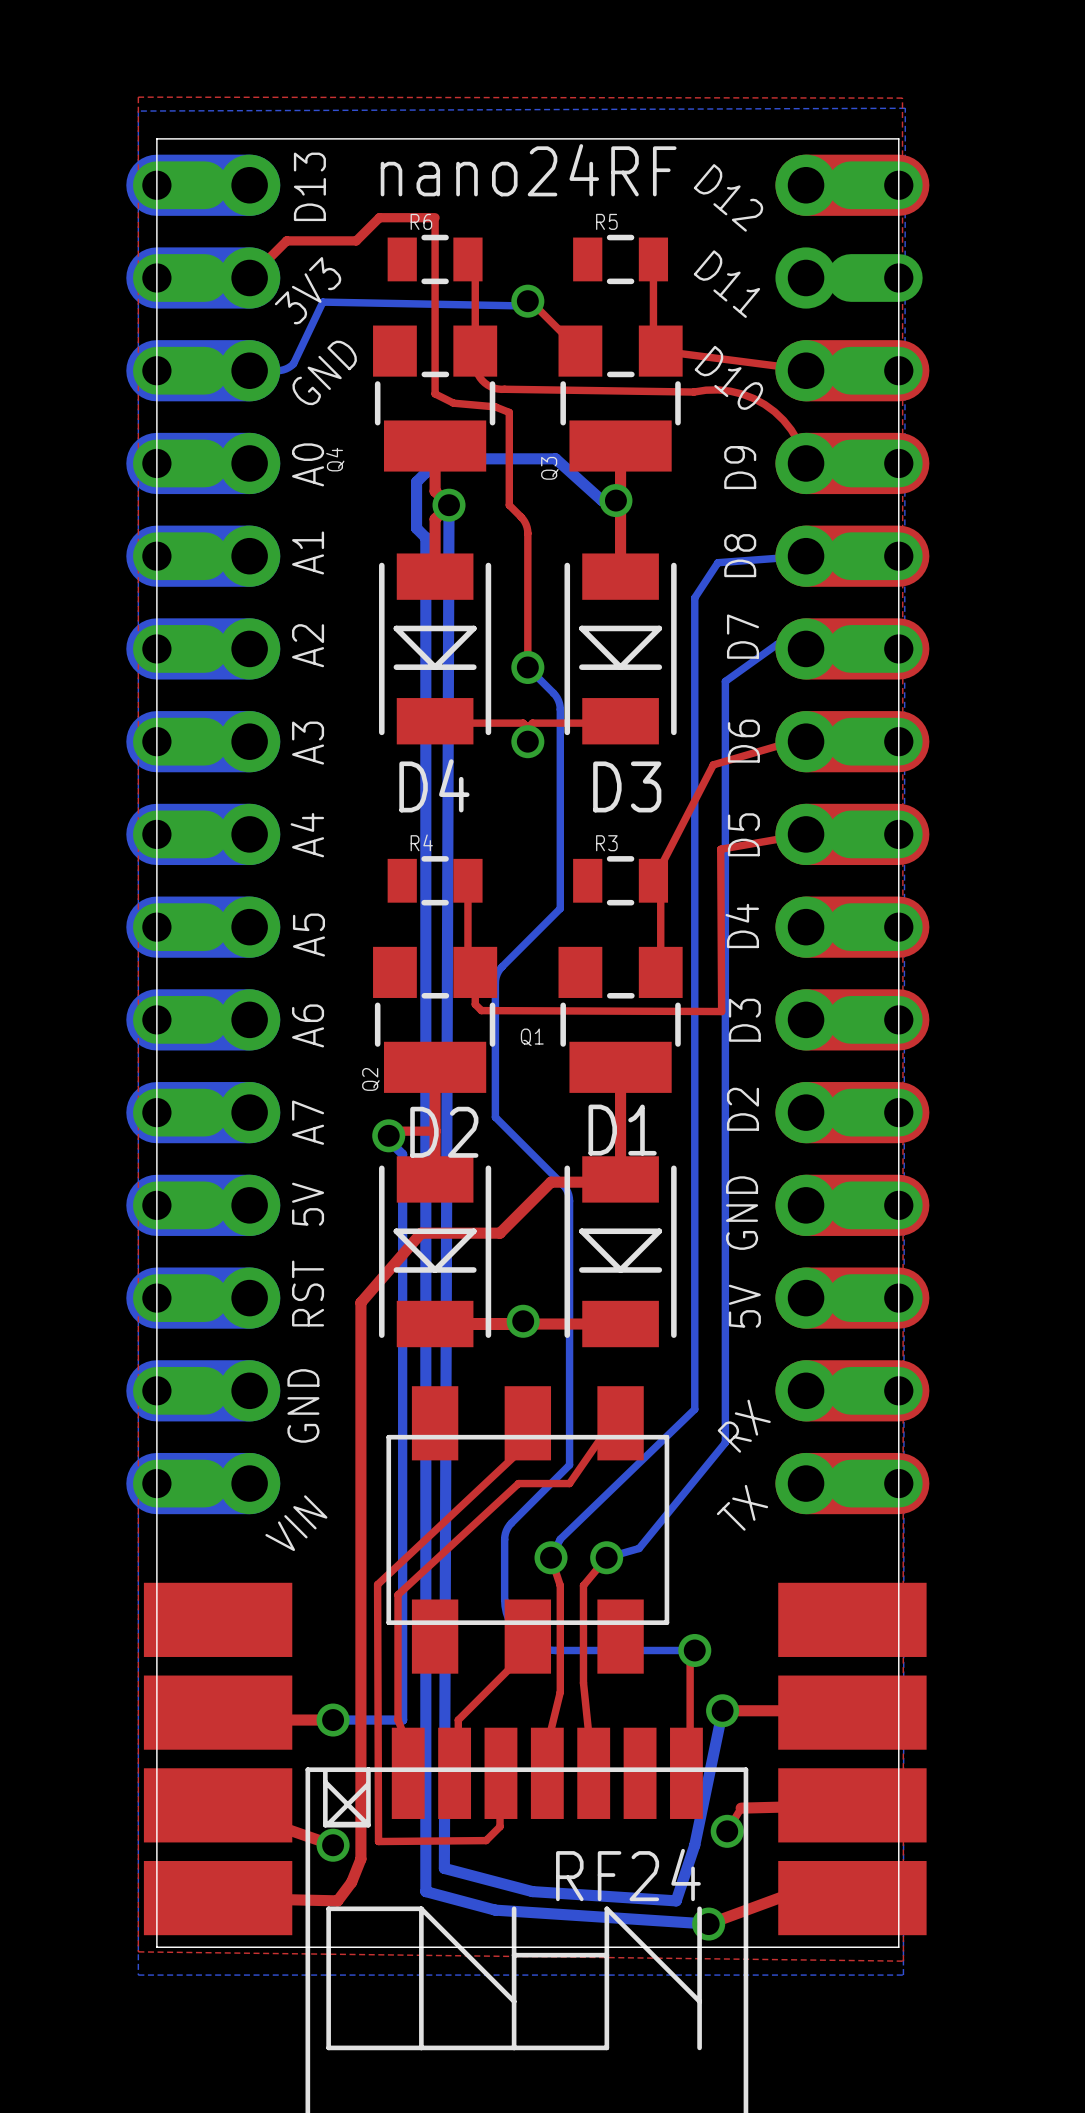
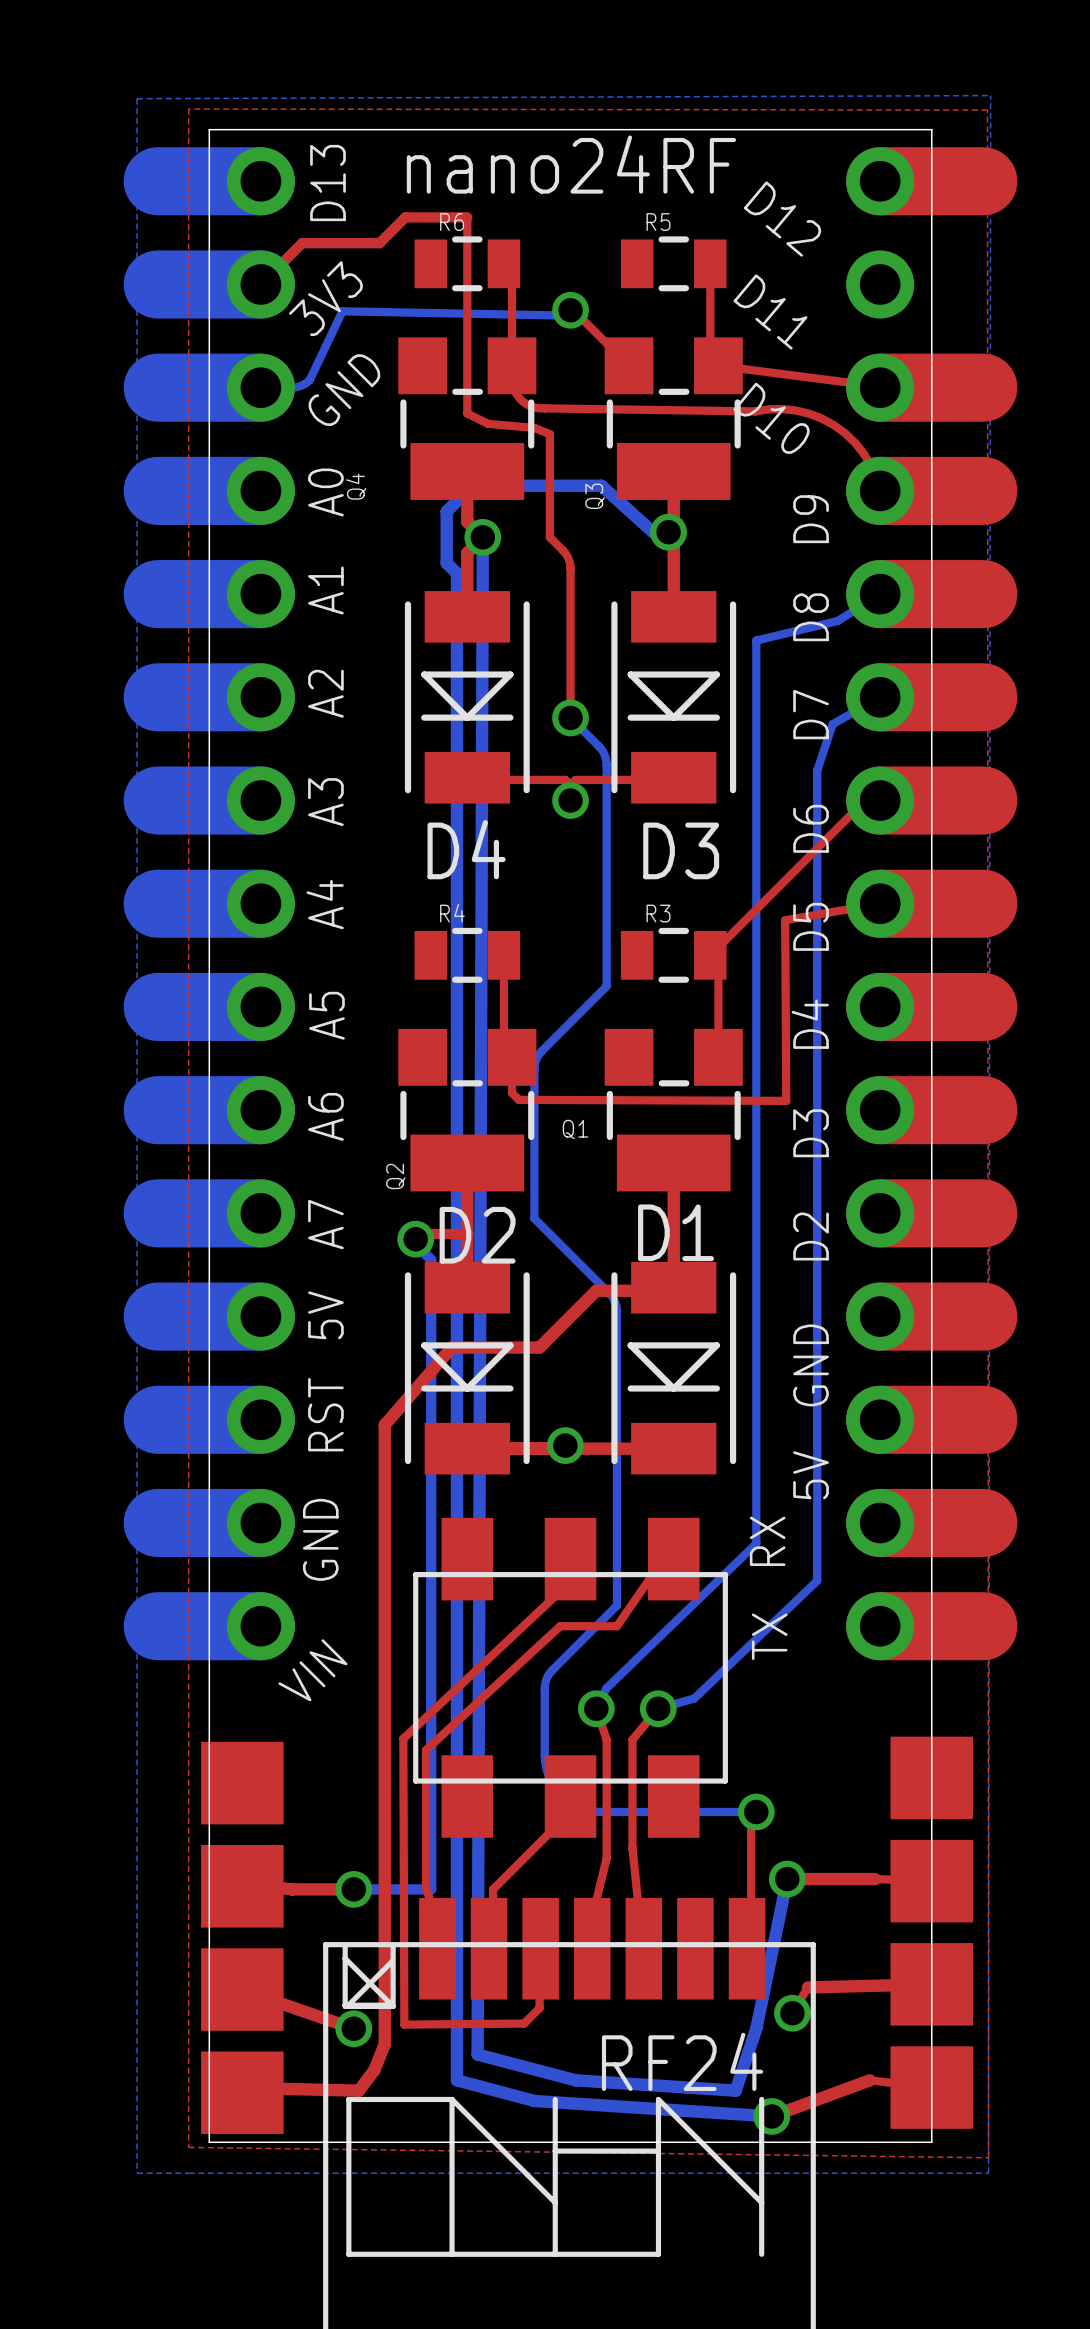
top zone outline: (902, 121) (902, 98) (138, 97) (138, 1951) (903, 1961) -> (987, 110) (188, 109) (188, 2147) (988, 2157)
board edge: (203, 138) (156, 138) (156, 1947) (203, 1947) -> (209, 129) (209, 2142)
board edge: (852, 138) (898, 138) (898, 1947) (852, 1947) -> (931, 129) (931, 2142)
text position: D12 (728, 197) -> D12 (782, 219)
text position: D11 (726, 284) -> D11 (770, 311)
text position: D10 (728, 377) -> D10 (771, 418)
text position: D9 (740, 467) -> D9 (811, 519)
text position: D8 (740, 555) -> D8 (811, 617)
bottom track: (806, 556) (717, 562) (694, 597) -> (880, 594) (837, 620) (756, 640)
text position: D7 (742, 636) -> D7 (811, 714)
bottom track: (806, 648) (777, 644) (725, 681) (725, 1442) (639, 1548) -> (880, 697) (832, 724) (817, 770) (817, 1580) (694, 1698)
text position: D6 (743, 741) -> D6 (811, 828)
top track: (792, 741) (713, 764) (653, 880) -> (865, 800) (710, 955)
part: (180, 834) -> none
text position: D5 (743, 834) -> D5 (811, 926)
part: (874, 834) -> none
text position: D4 (742, 925) -> D4 (810, 1024)
text position: D3 (744, 1020) -> D3 (811, 1133)
text position: D2 (742, 1109) -> D2 (811, 1236)
text position: GND (742, 1213) -> GND (811, 1365)
text position: 5V (744, 1306) -> 5V (811, 1475)
text rotation: 0° (744, 1426) -> 45° counterclockwise (767, 1541)
text rotation: 0° (742, 1507) -> 45° counterclockwise (769, 1636)
part footprint: [143, 1582, 293, 1936] -> [201, 1741, 284, 2135]
part footprint: [778, 1582, 927, 1936] -> [890, 1736, 974, 2129]

